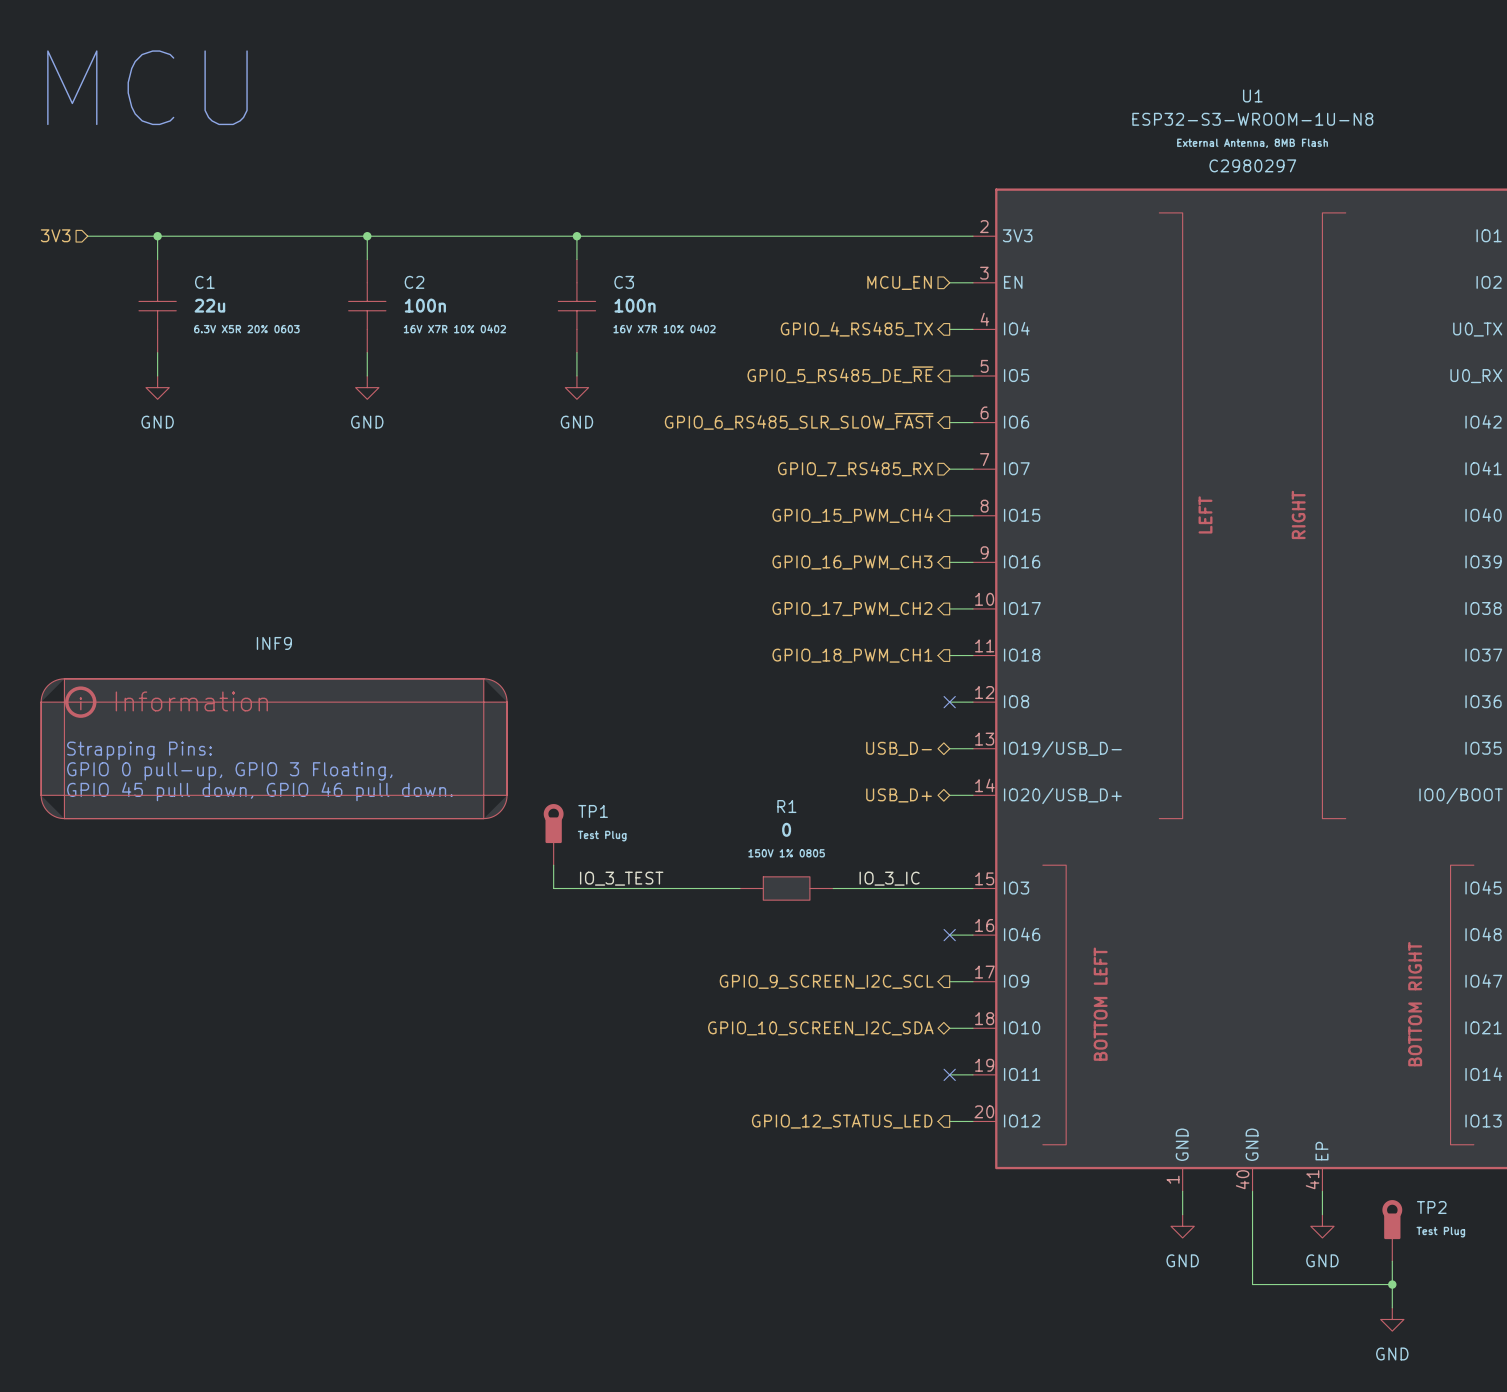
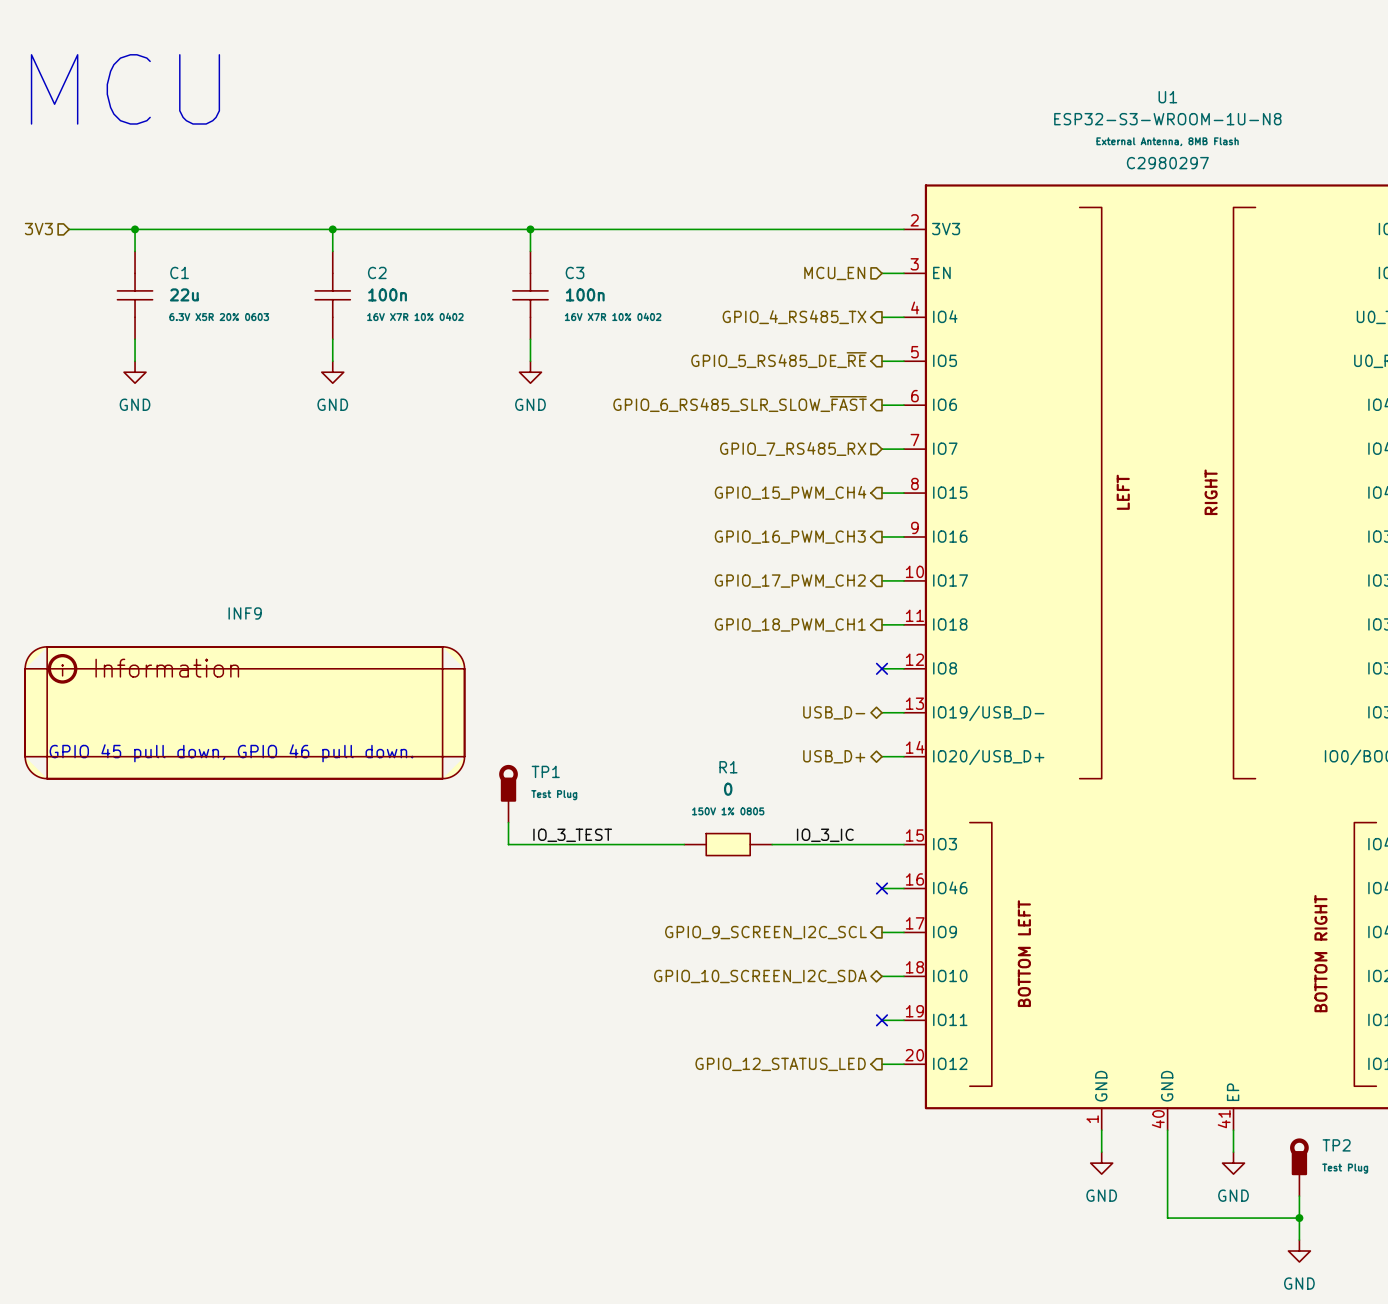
text: Strapping Pins: (139, 750) -> none
text: GPIO 0 pull-up, GPIO 3 Floating, (229, 771) -> none

